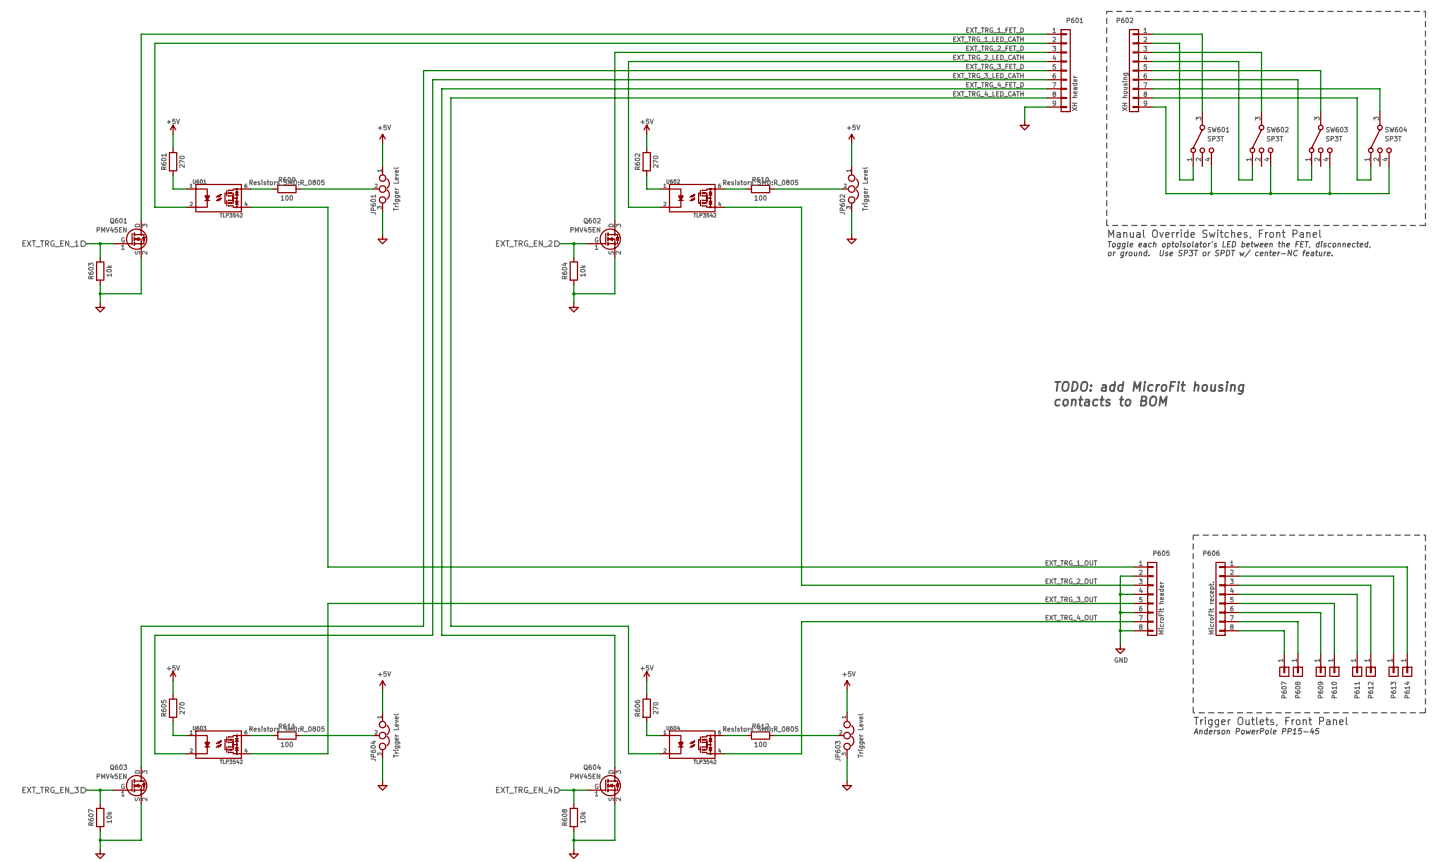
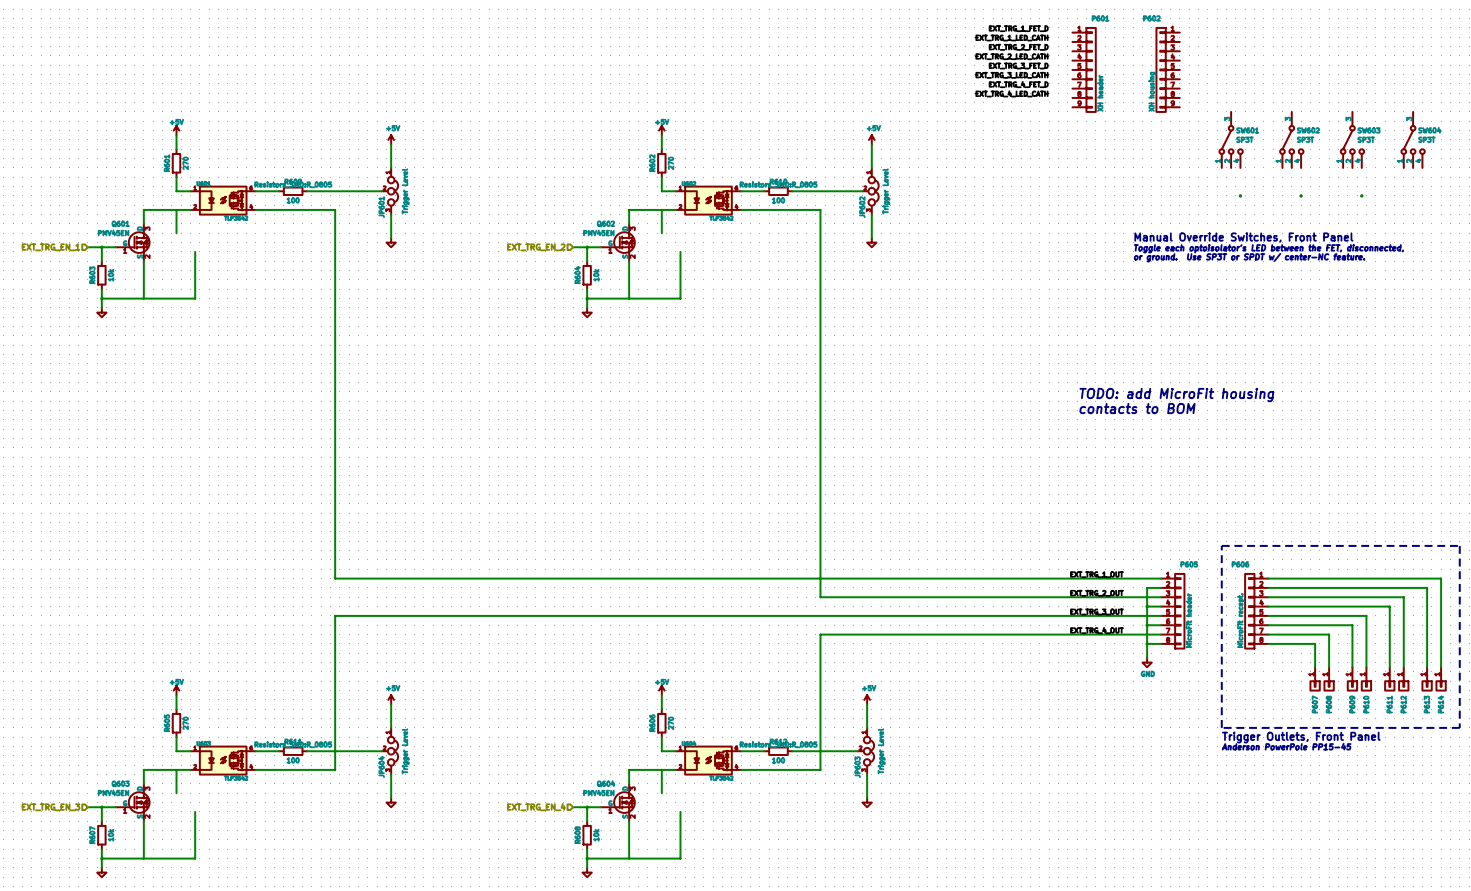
line: (1106, 11) (1425, 11) (1425, 225) (1106, 225) (1106, 11) -> none
wire: (1047, 34) (141, 34) (141, 207) -> (157, 209) (143, 209)
wire: (1152, 34) (1202, 34) (1202, 111) -> none
wire: (1047, 43) (154, 43) (154, 207) -> none
wire: (1152, 43) (1179, 43) (1179, 179) (1193, 179) (1193, 166) -> none
wire: (1047, 52) (614, 52) (614, 207) -> (643, 209) (629, 209)
wire: (1152, 52) (1261, 52) (1261, 111) -> none
wire: (1047, 61) (628, 61) (628, 207) -> none
wire: (1152, 61) (1238, 61) (1238, 179) (1252, 179) (1252, 166) -> none
wire: (1047, 70) (423, 70) (423, 626) (141, 626) (141, 753) -> (157, 769) (143, 769)
wire: (1152, 70) (1320, 70) (1320, 111) -> none
wire: (1047, 79) (432, 79) (432, 635) (154, 635) (154, 753) -> none
wire: (1152, 79) (1297, 79) (1297, 179) (1311, 179) (1311, 166) -> none
wire: (1047, 88) (441, 88) (441, 635) (614, 635) (614, 753) -> none
wire: (1152, 88) (1379, 88) (1379, 111) -> none
wire: (1047, 97) (450, 97) (450, 626) (628, 626) (628, 753) -> (629, 769) (643, 769)
wire: (1152, 97) (1357, 97) (1357, 179) (1370, 179) (1370, 166) -> none
wire: (1047, 107) (1024, 107) (1024, 120) -> none
wire: (1152, 107) (1165, 107) (1165, 193) (1389, 193) (1389, 166) -> none
power symbol: (1024, 125) -> none
wire: (1211, 166) (1211, 193) -> none
wire: (1270, 166) (1270, 193) -> none
wire: (1329, 166) (1329, 193) -> none
wire: none -> (176, 209) (176, 233)
wire: none -> (661, 209) (661, 233)
wire: none -> (195, 251) (195, 298) (143, 298)
wire: none -> (680, 251) (680, 298) (629, 298)
wire: none -> (176, 769) (176, 793)
wire: none -> (661, 769) (661, 793)
wire: none -> (195, 811) (195, 858) (143, 858)
wire: none -> (680, 811) (680, 858) (629, 858)

